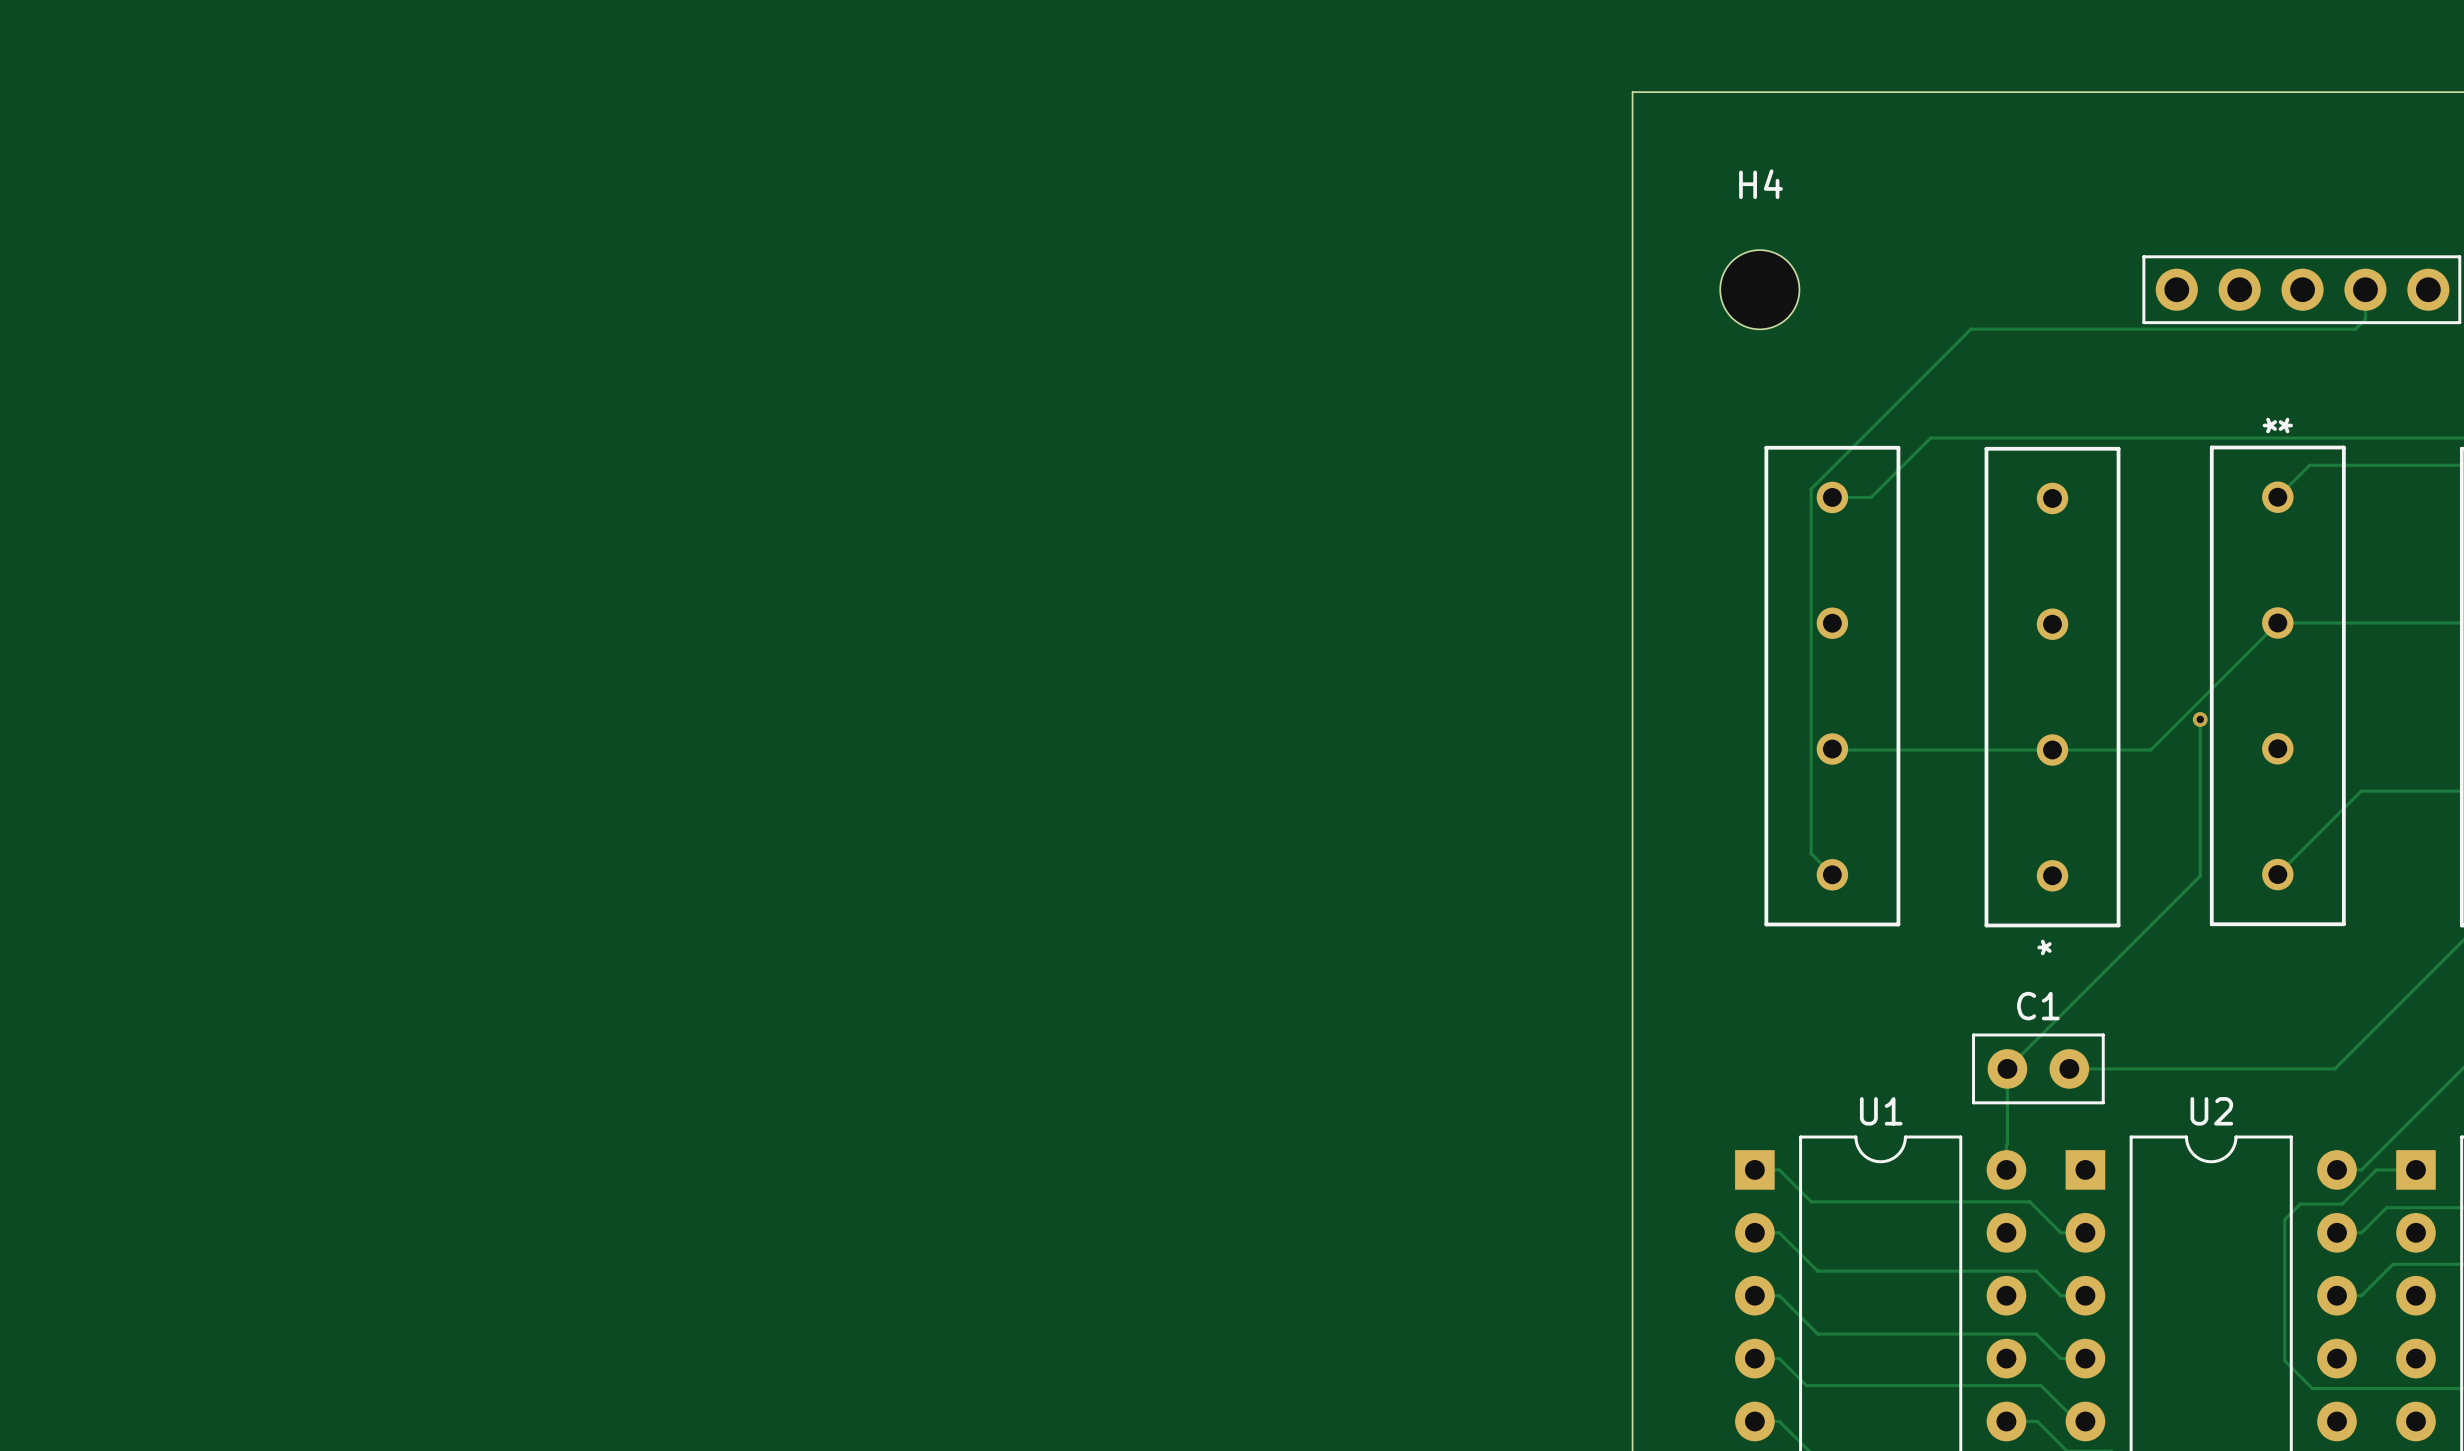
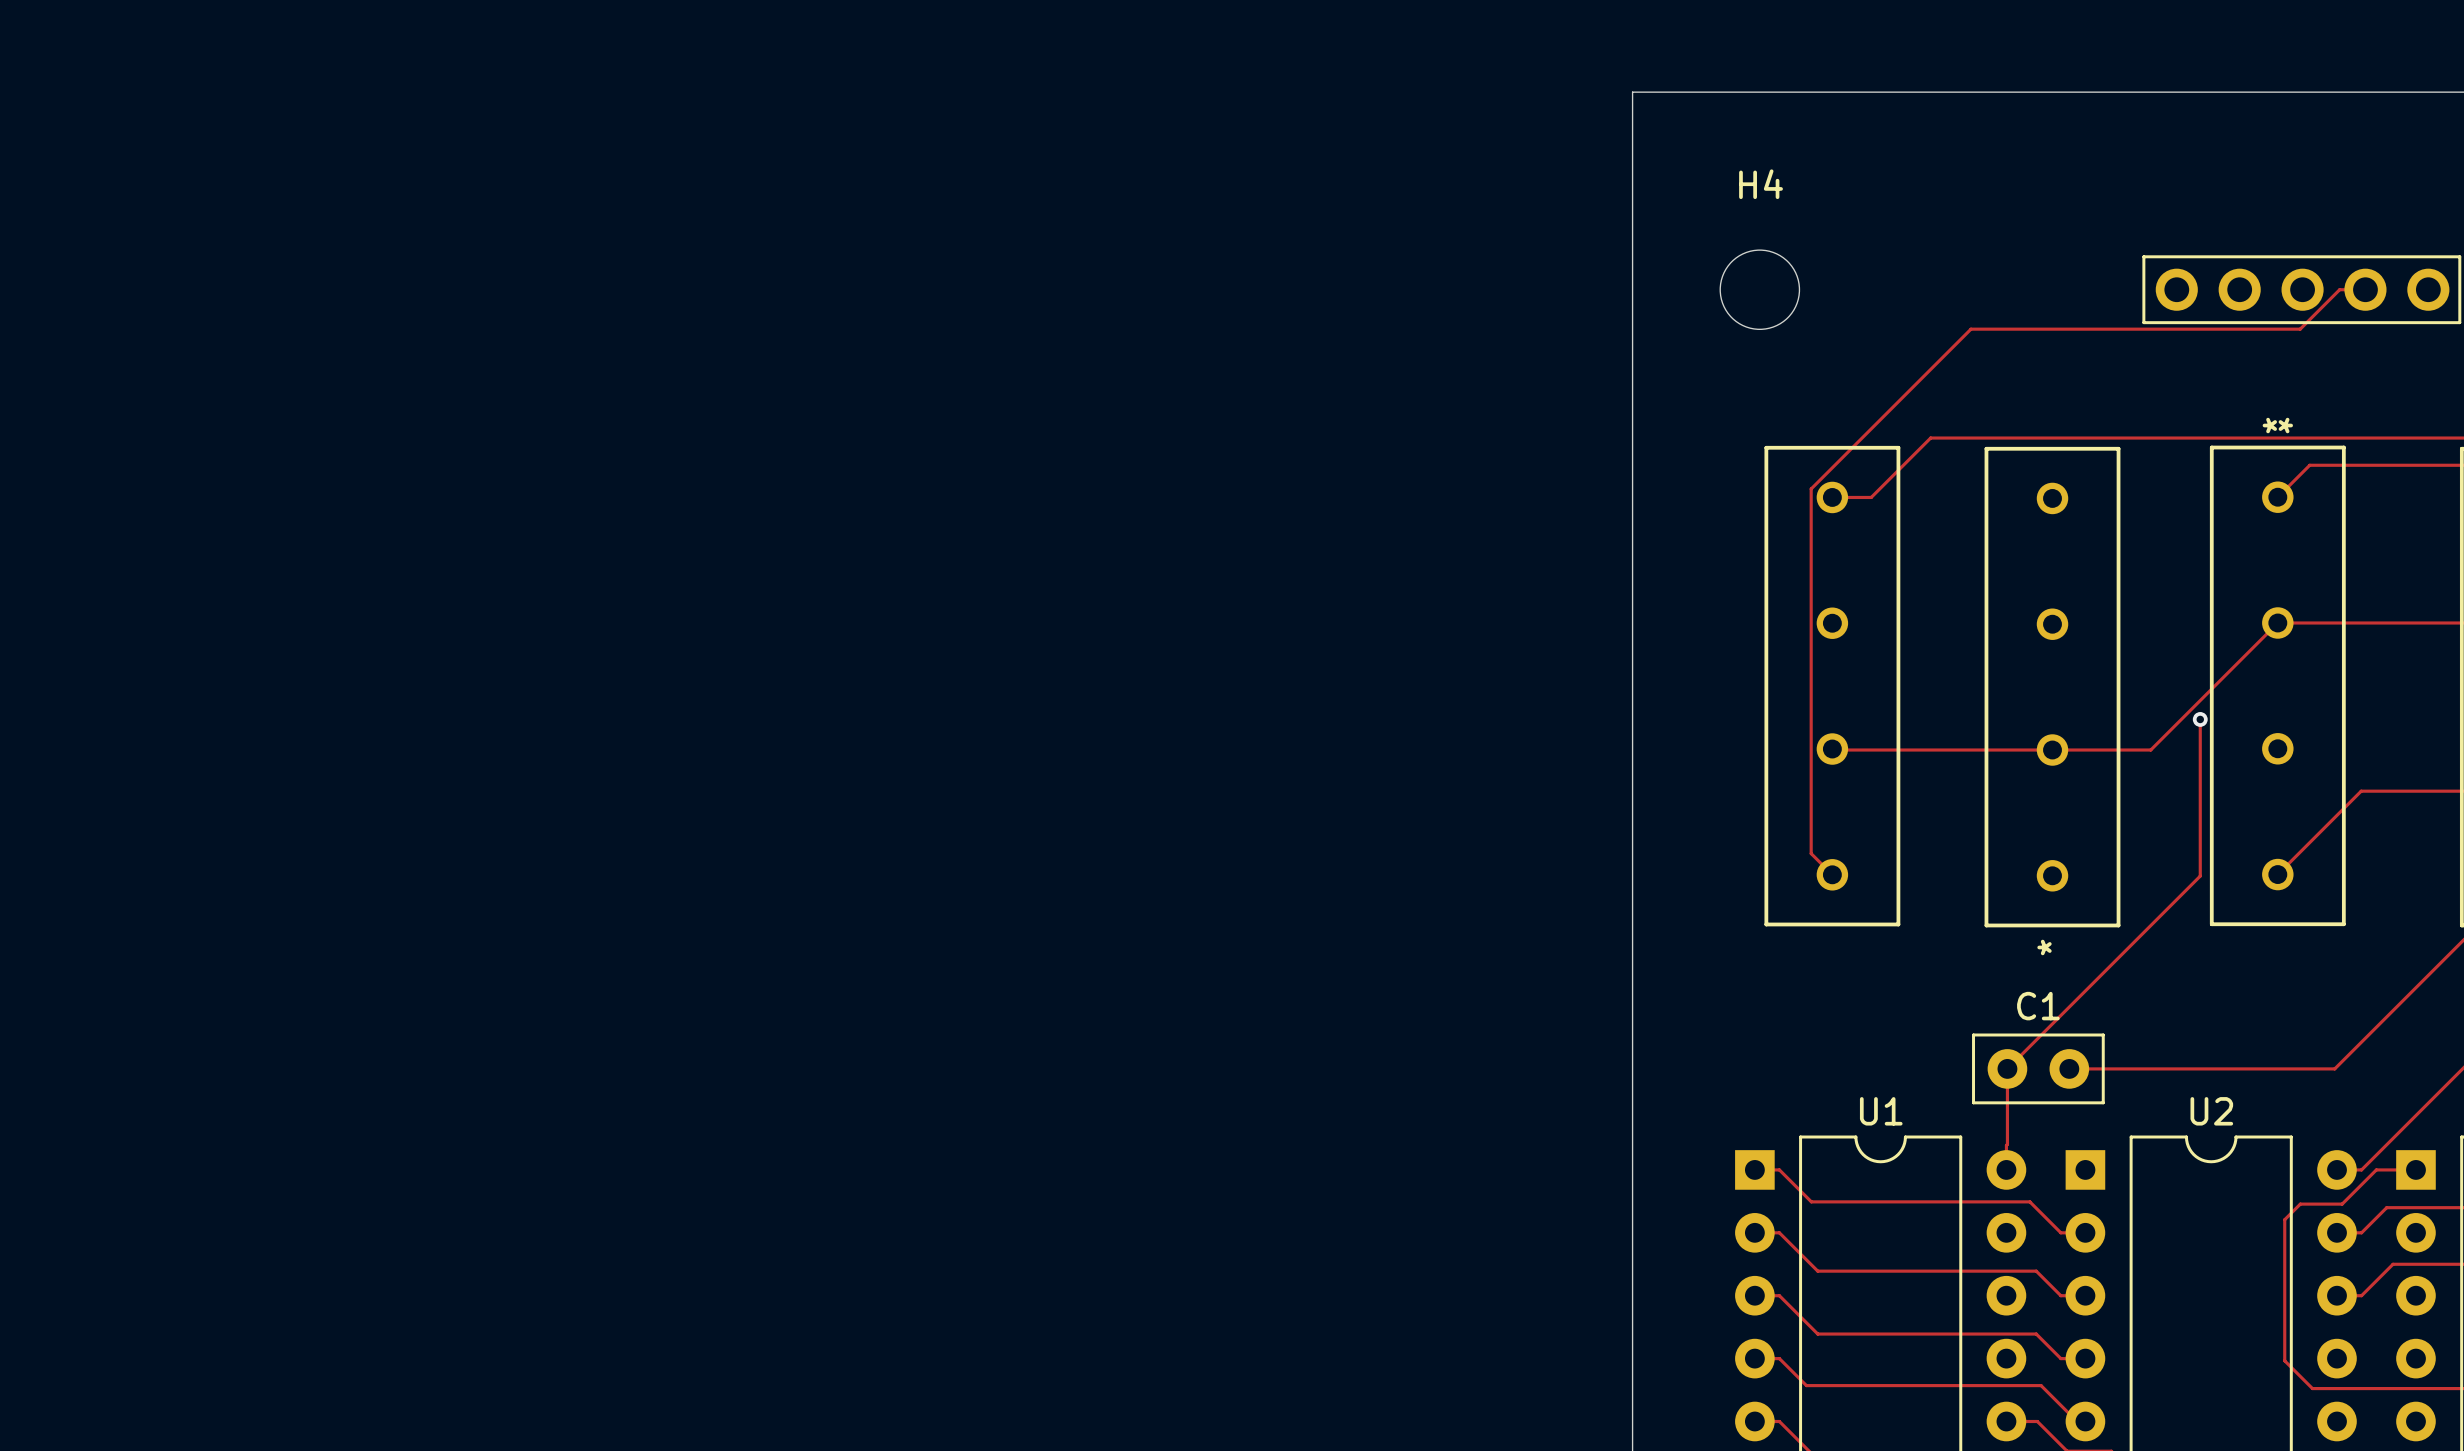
track: (2365, 289) (2365, 319) (2355, 329) (2300, 329) -> (2365, 289) (2339, 289) (2300, 329)

